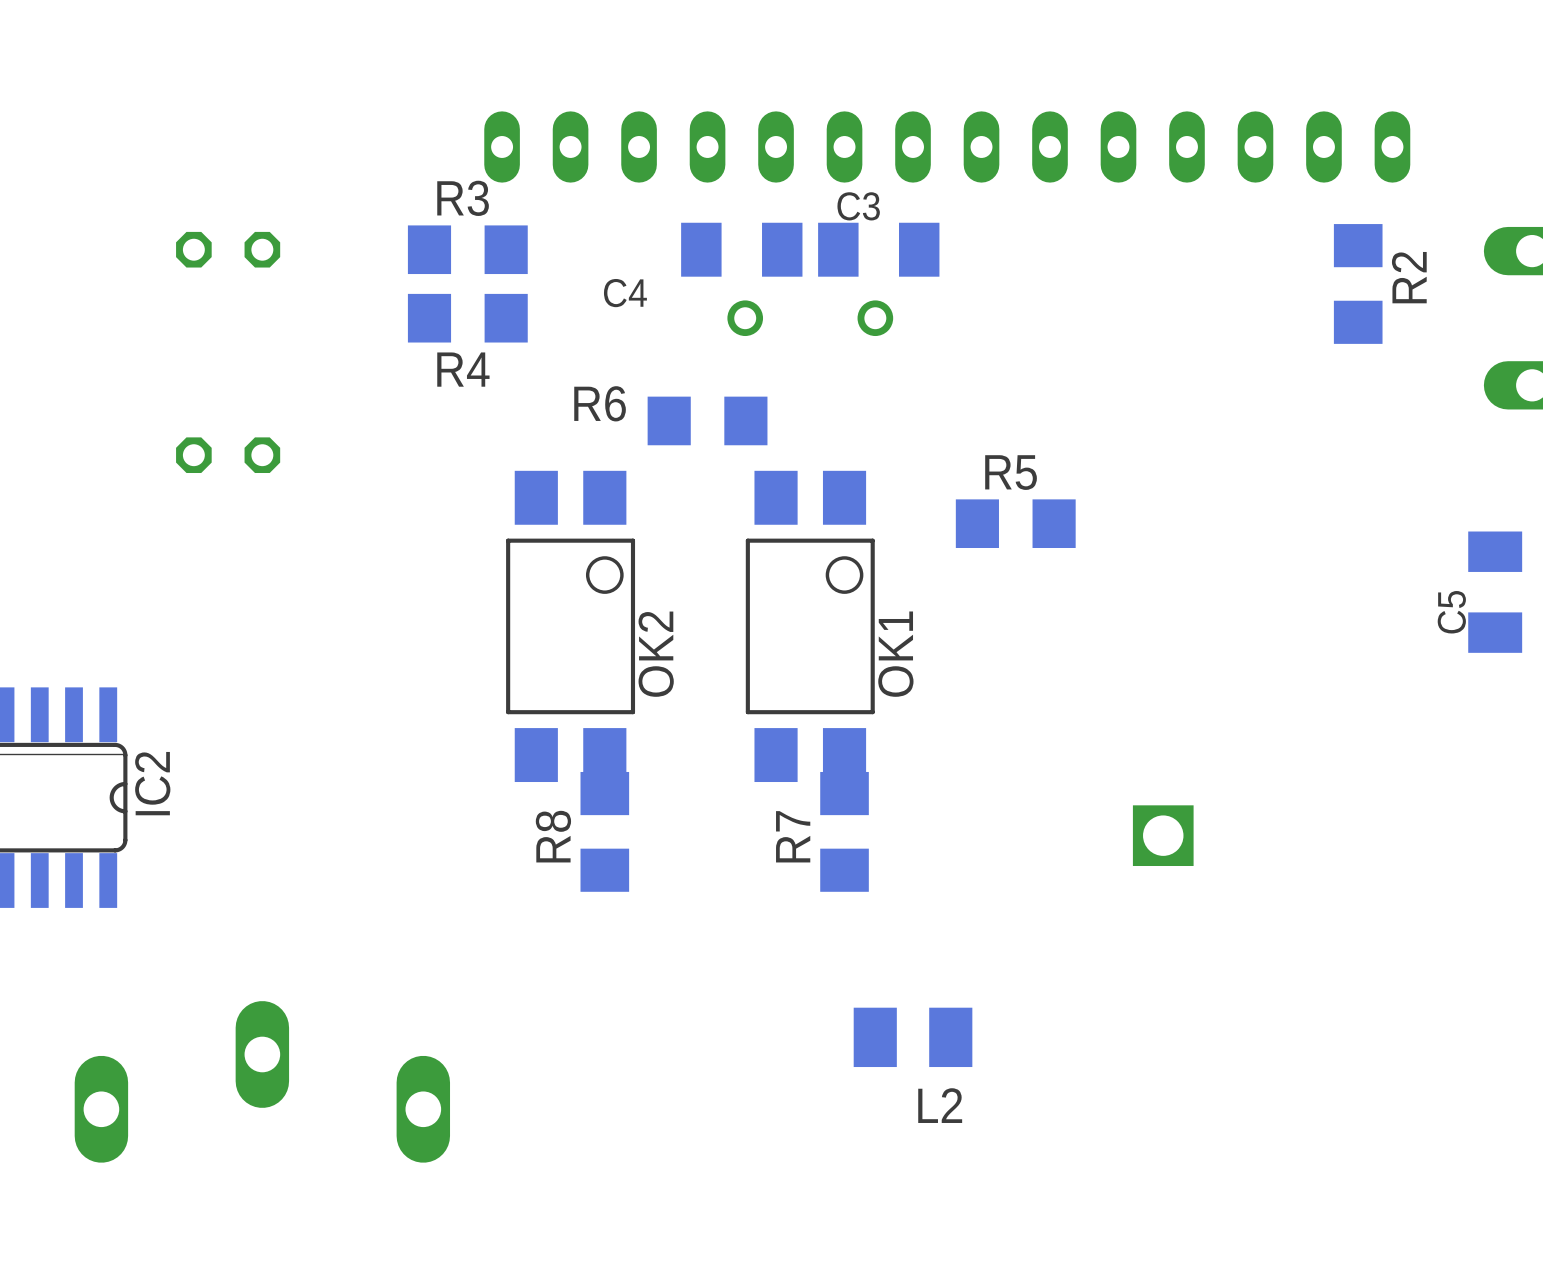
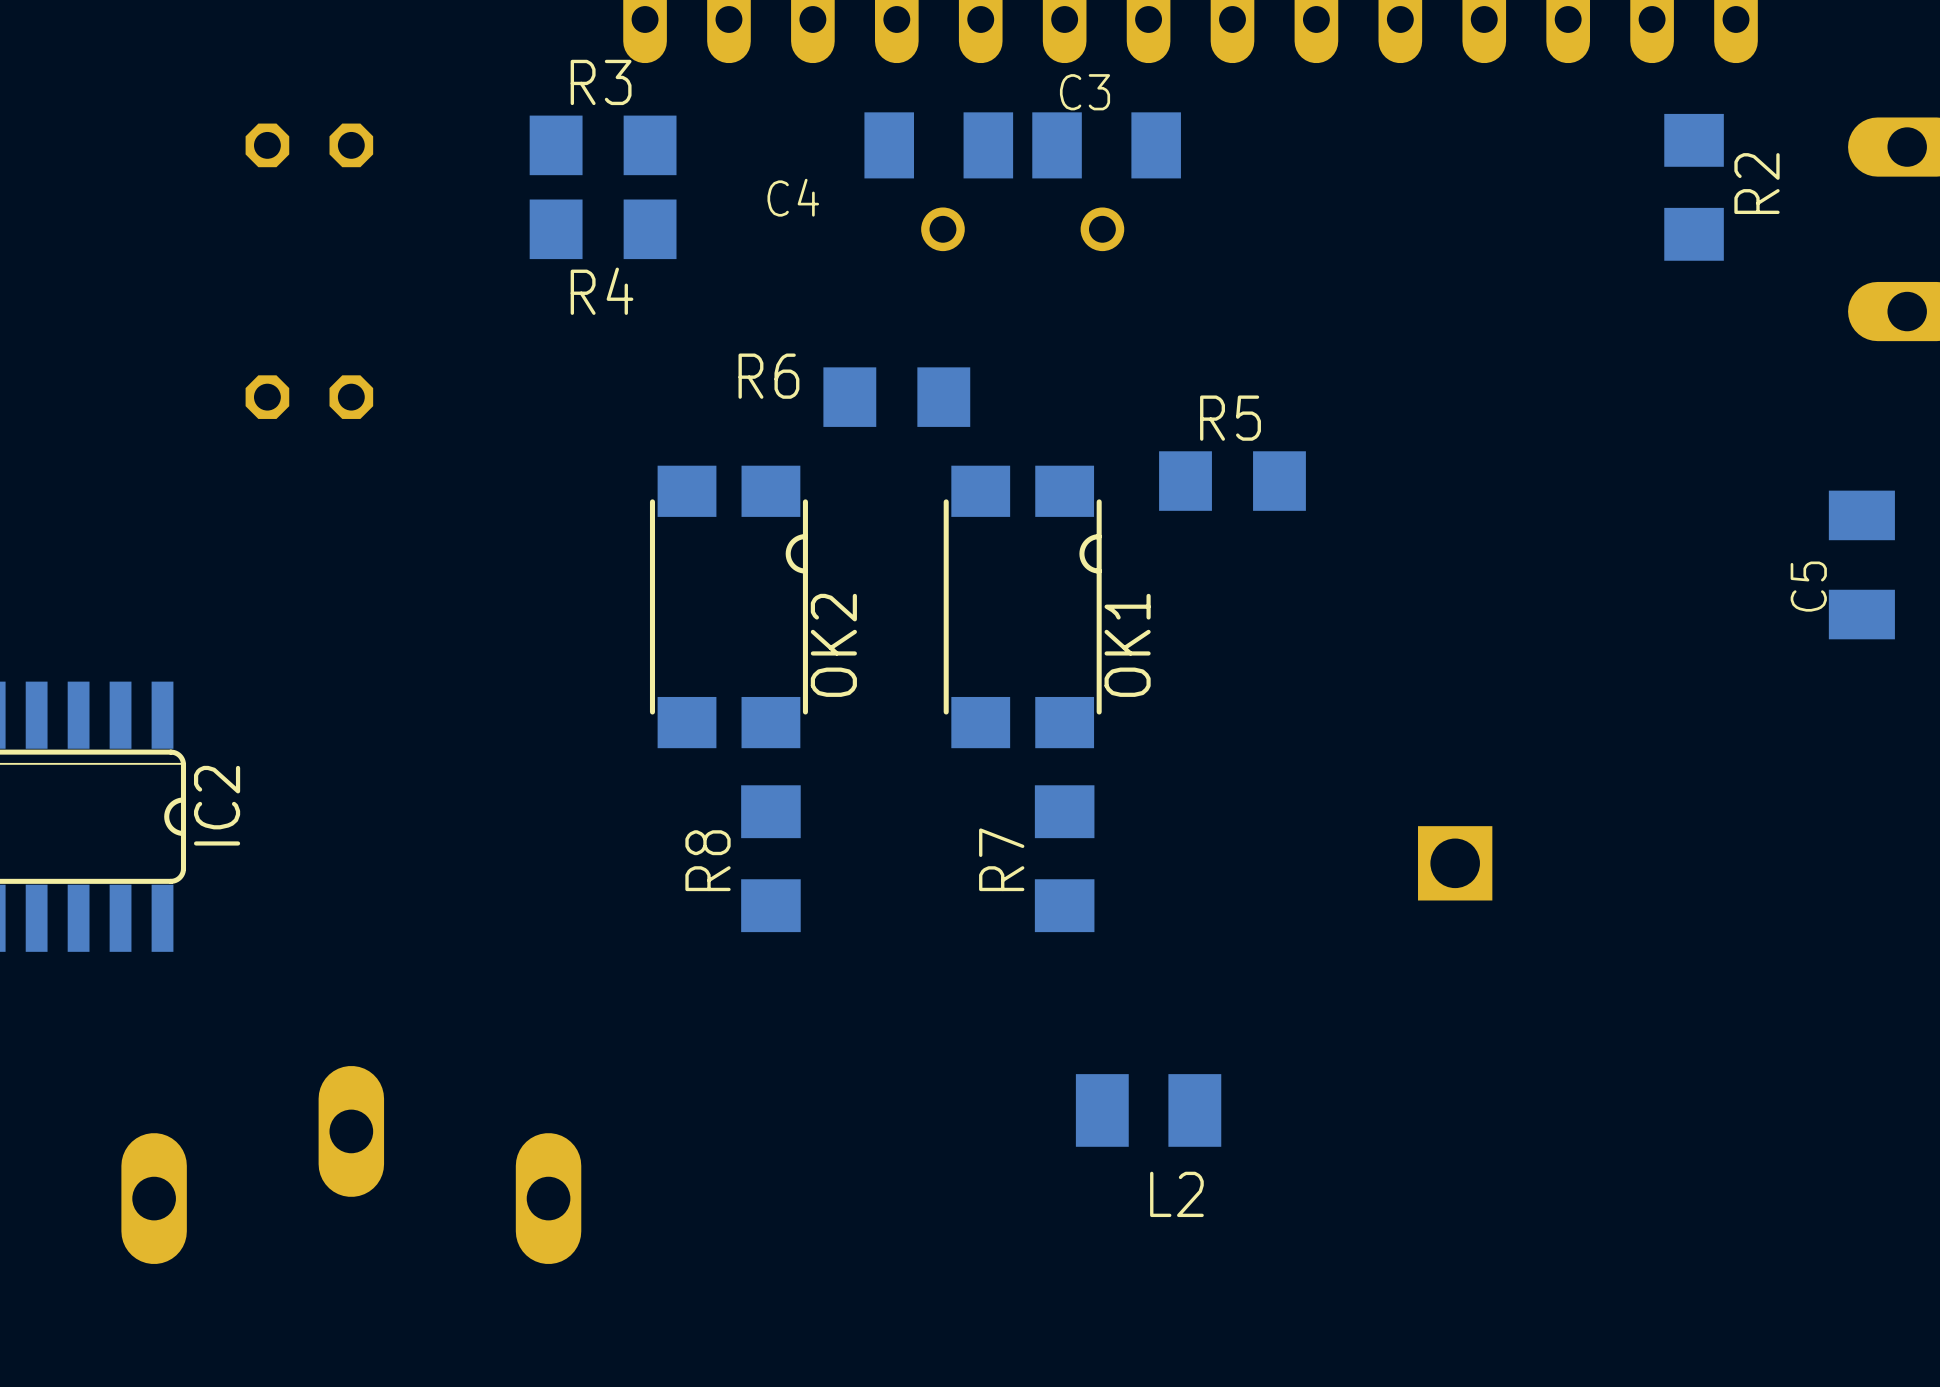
R6 position: (707, 420) -> (896, 397)
OK2 footprint: [506, 470, 636, 783] -> [649, 465, 808, 749]
OK1 footprint: [745, 470, 875, 783] -> [943, 465, 1102, 749]
R5 position: (1015, 523) -> (1232, 481)

